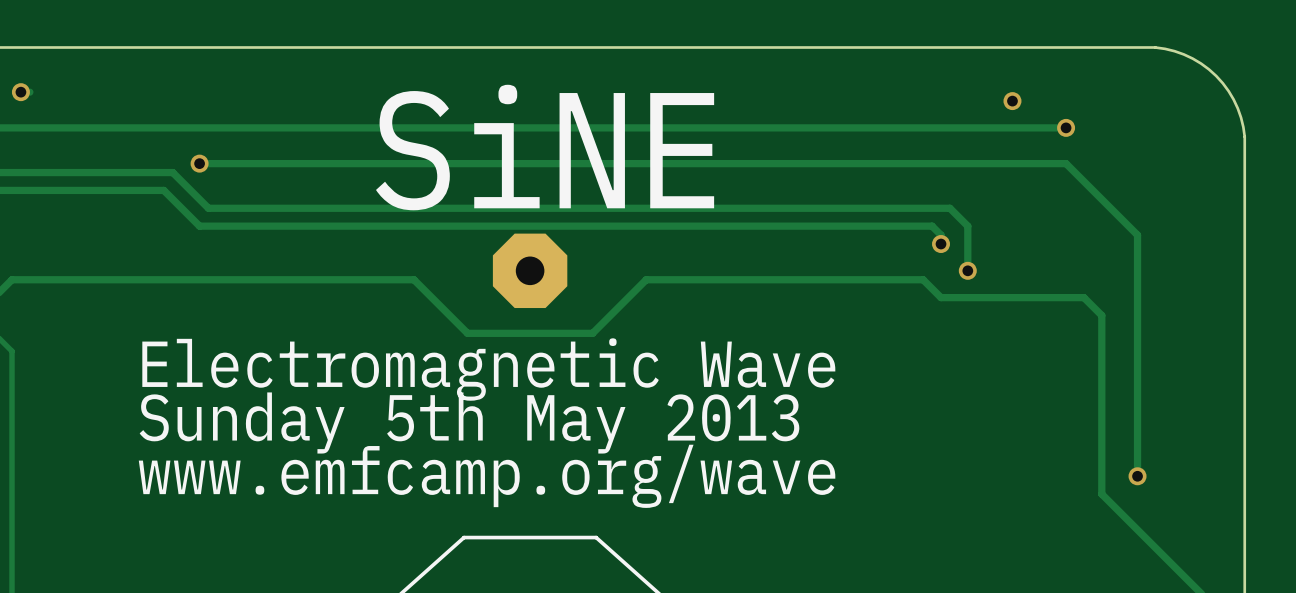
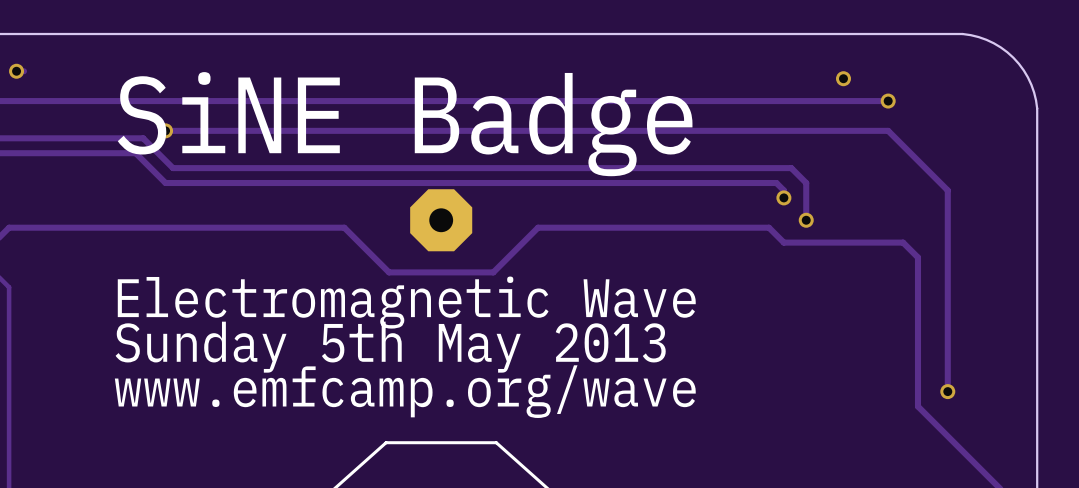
text: SiNE (545, 147) -> none
text: none -> SiNE Badge (405, 124)

